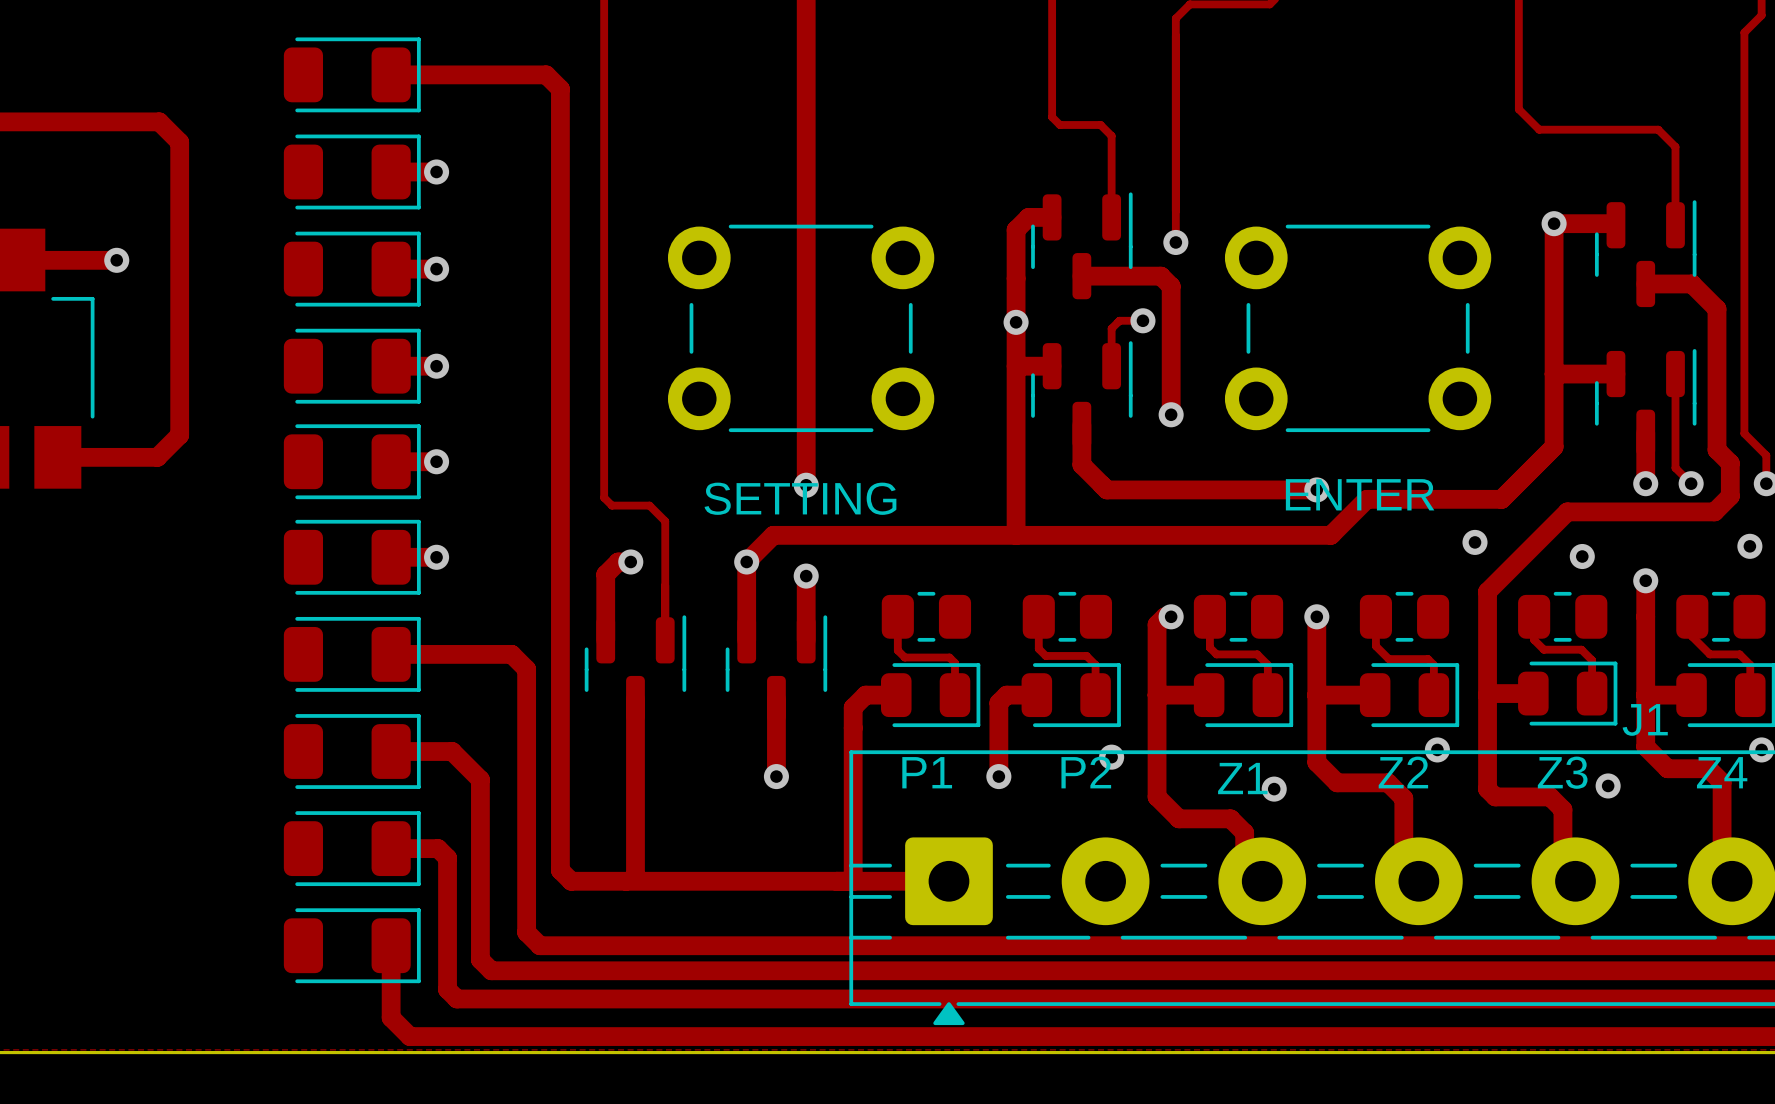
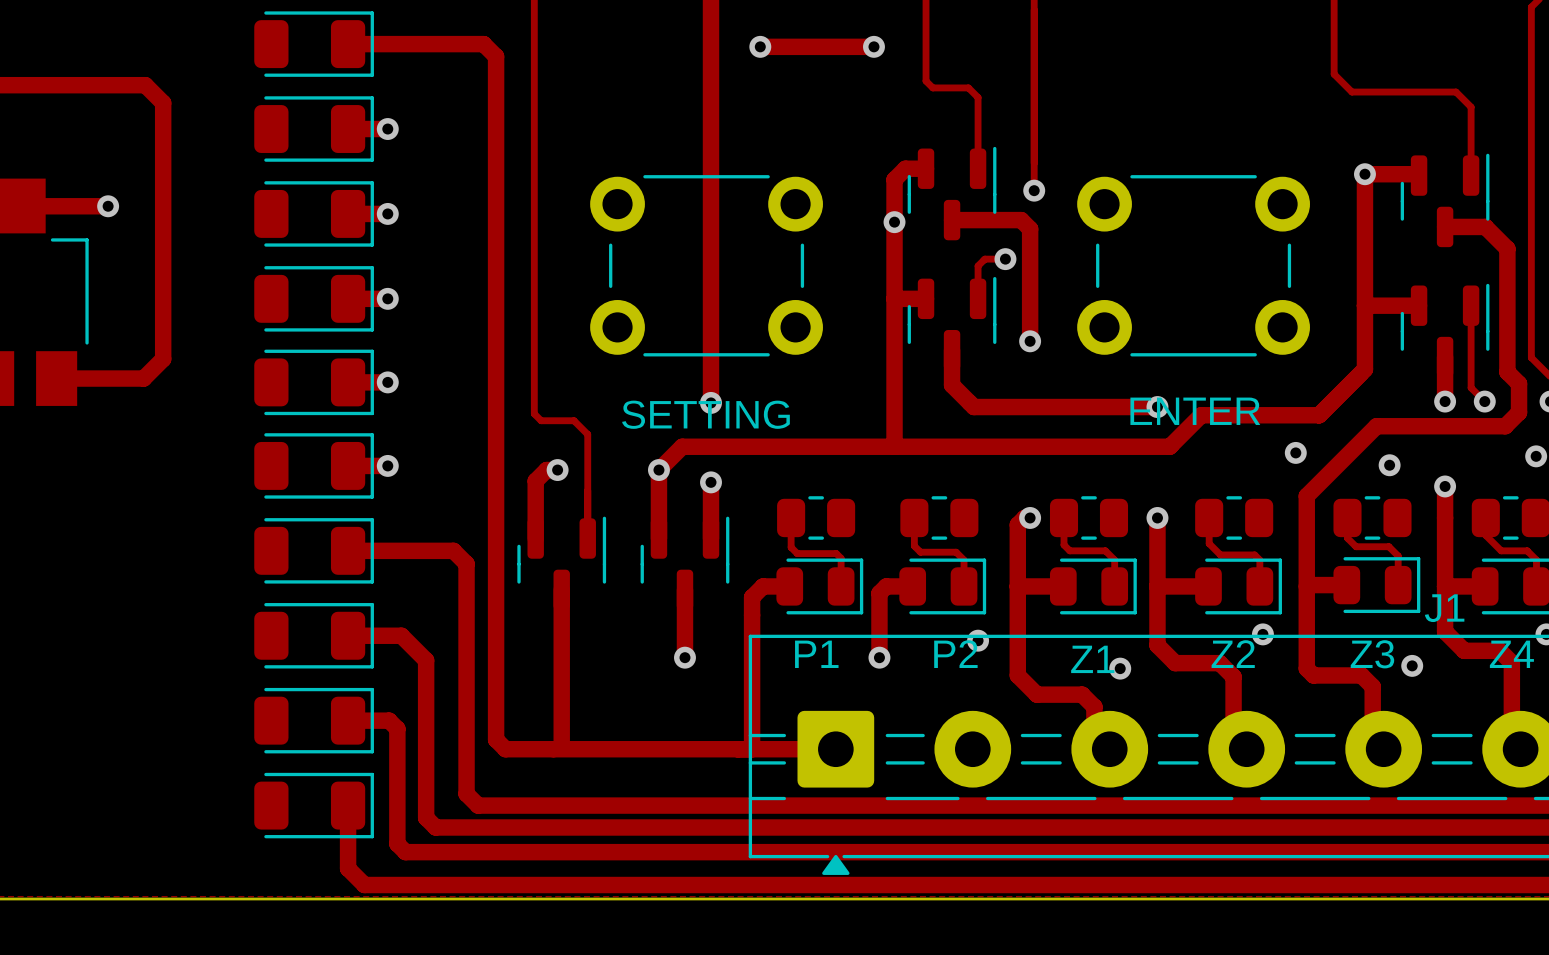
track: none -> (760, 46) (873, 46)
via: none -> (760, 46)
via: none -> (873, 46)
via position: (1016, 322) -> (894, 222)

